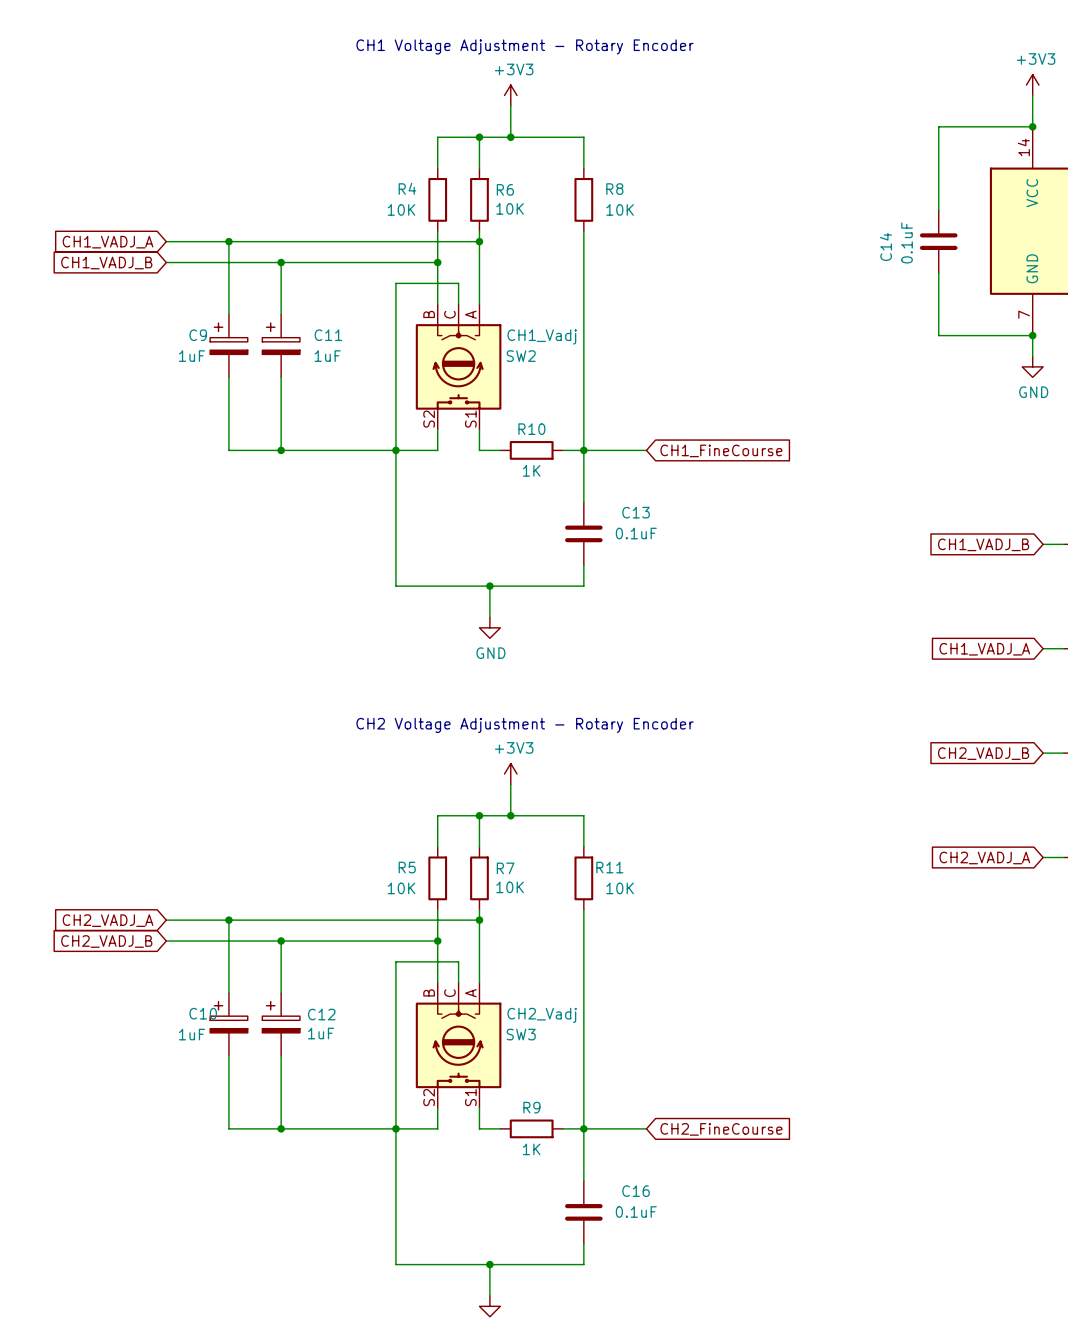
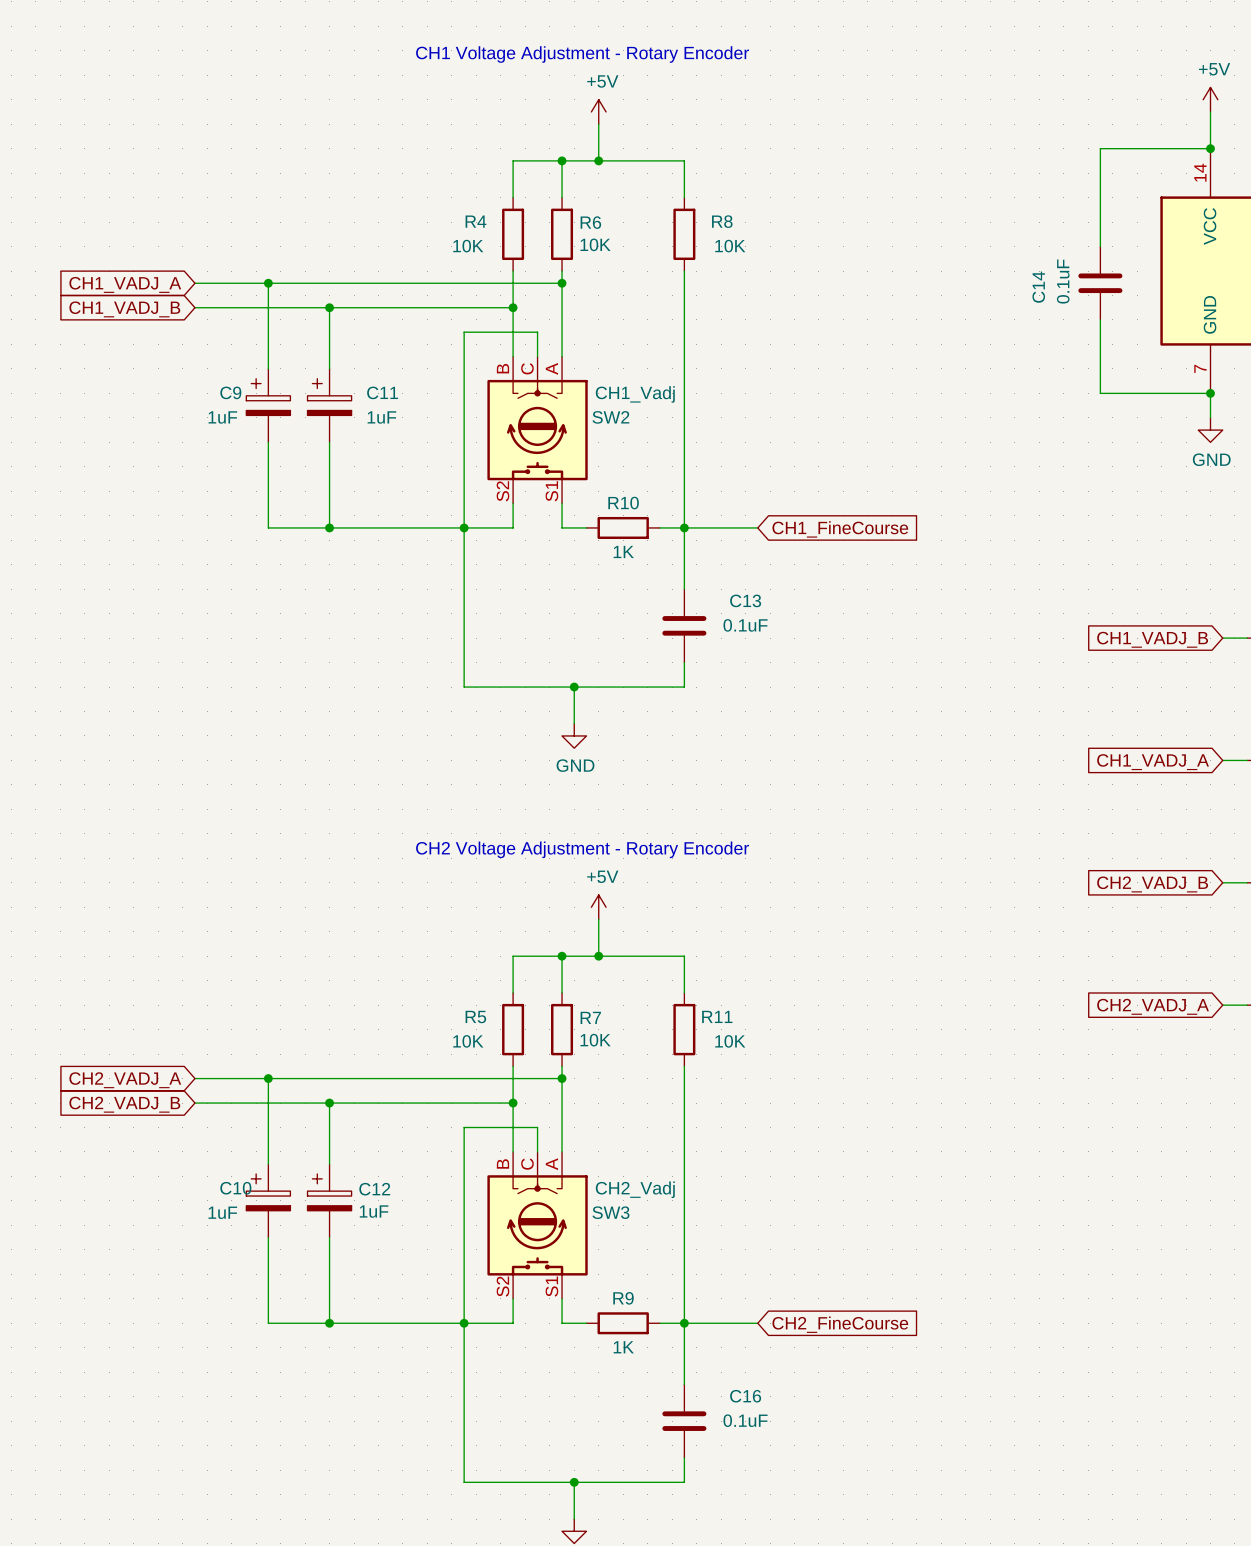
power symbol: +3V3 (1032, 85) -> +5V (1210, 99)
power symbol: +3V3 (510, 95) -> +5V (598, 111)
power symbol: +3V3 (510, 773) -> +5V (598, 907)

